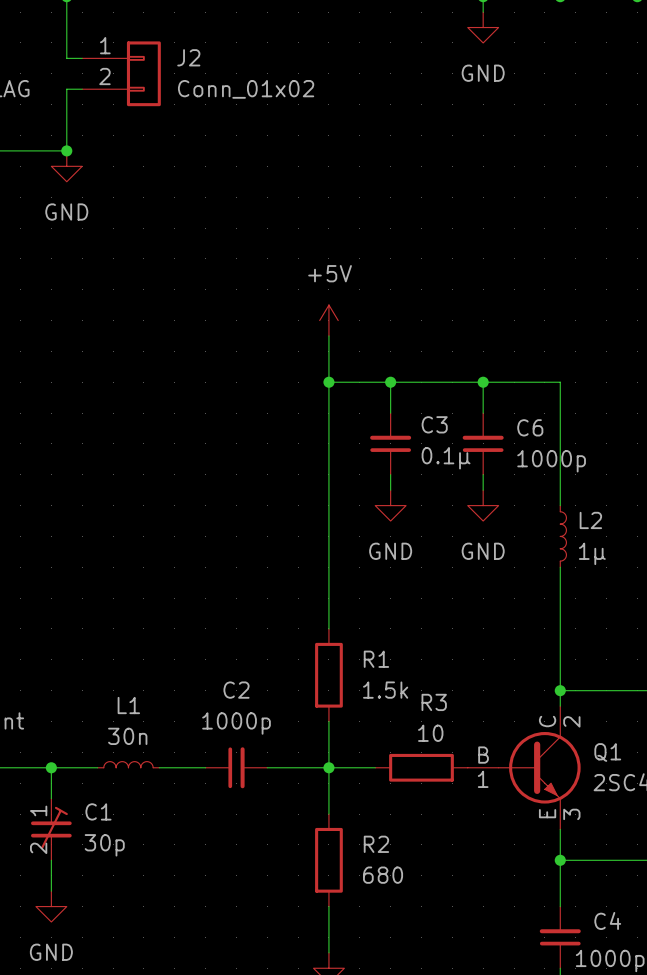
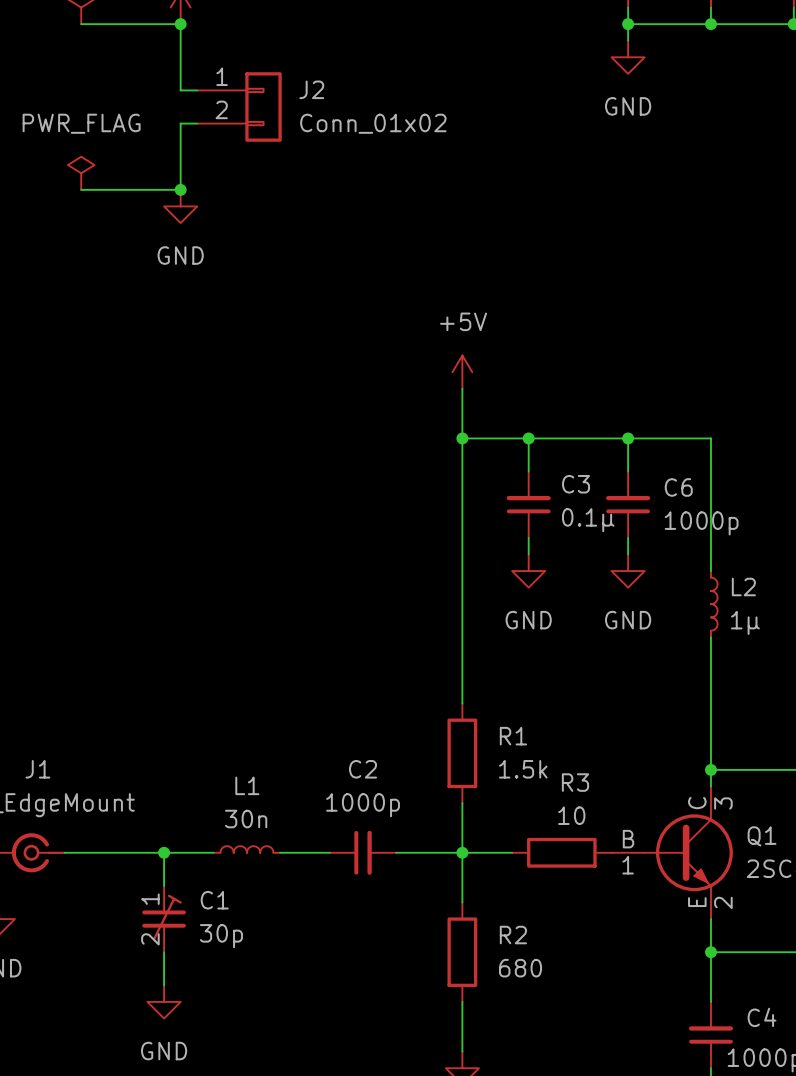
Q1 pin number: 2 (571, 721) -> 3 (723, 803)
Q1 pin number: 3 (571, 814) -> 2 (723, 902)

